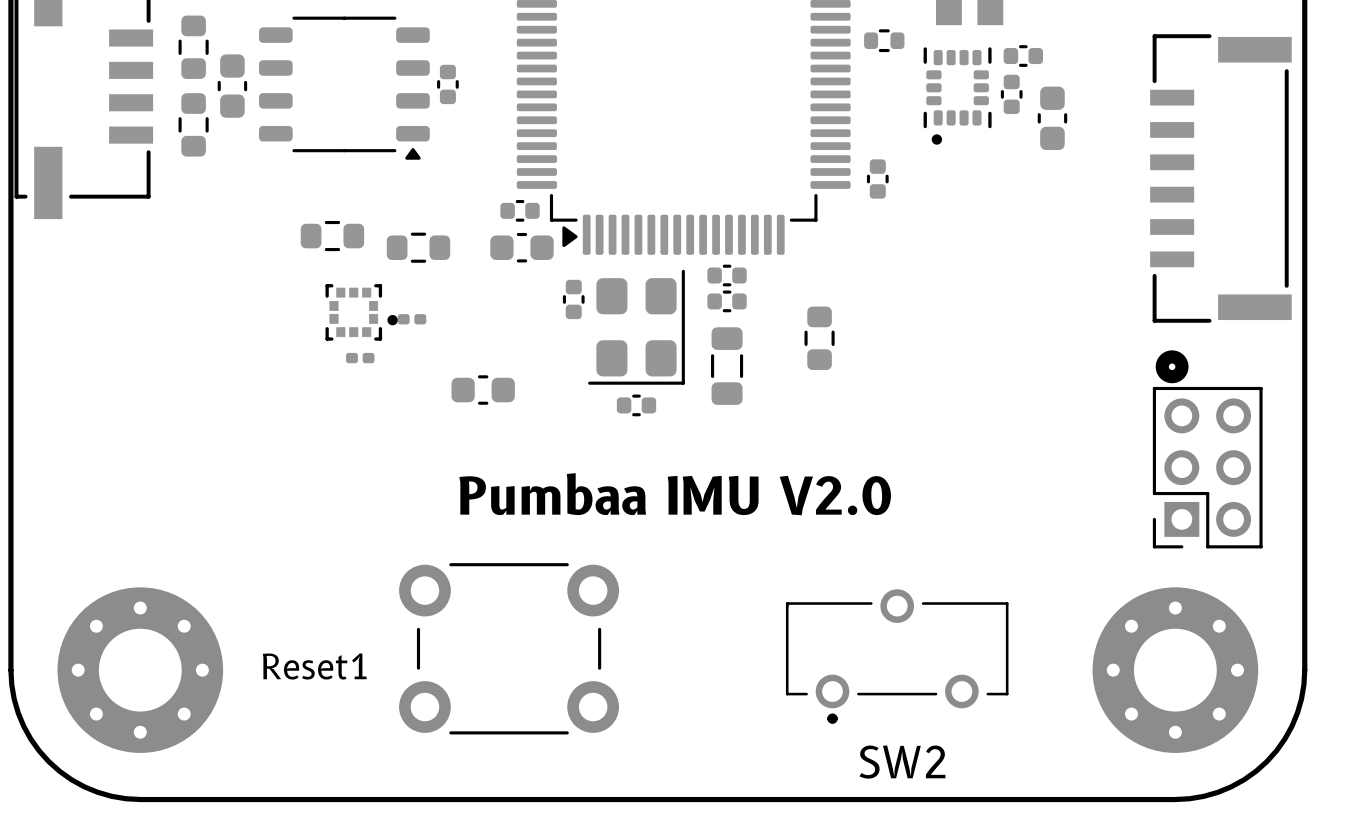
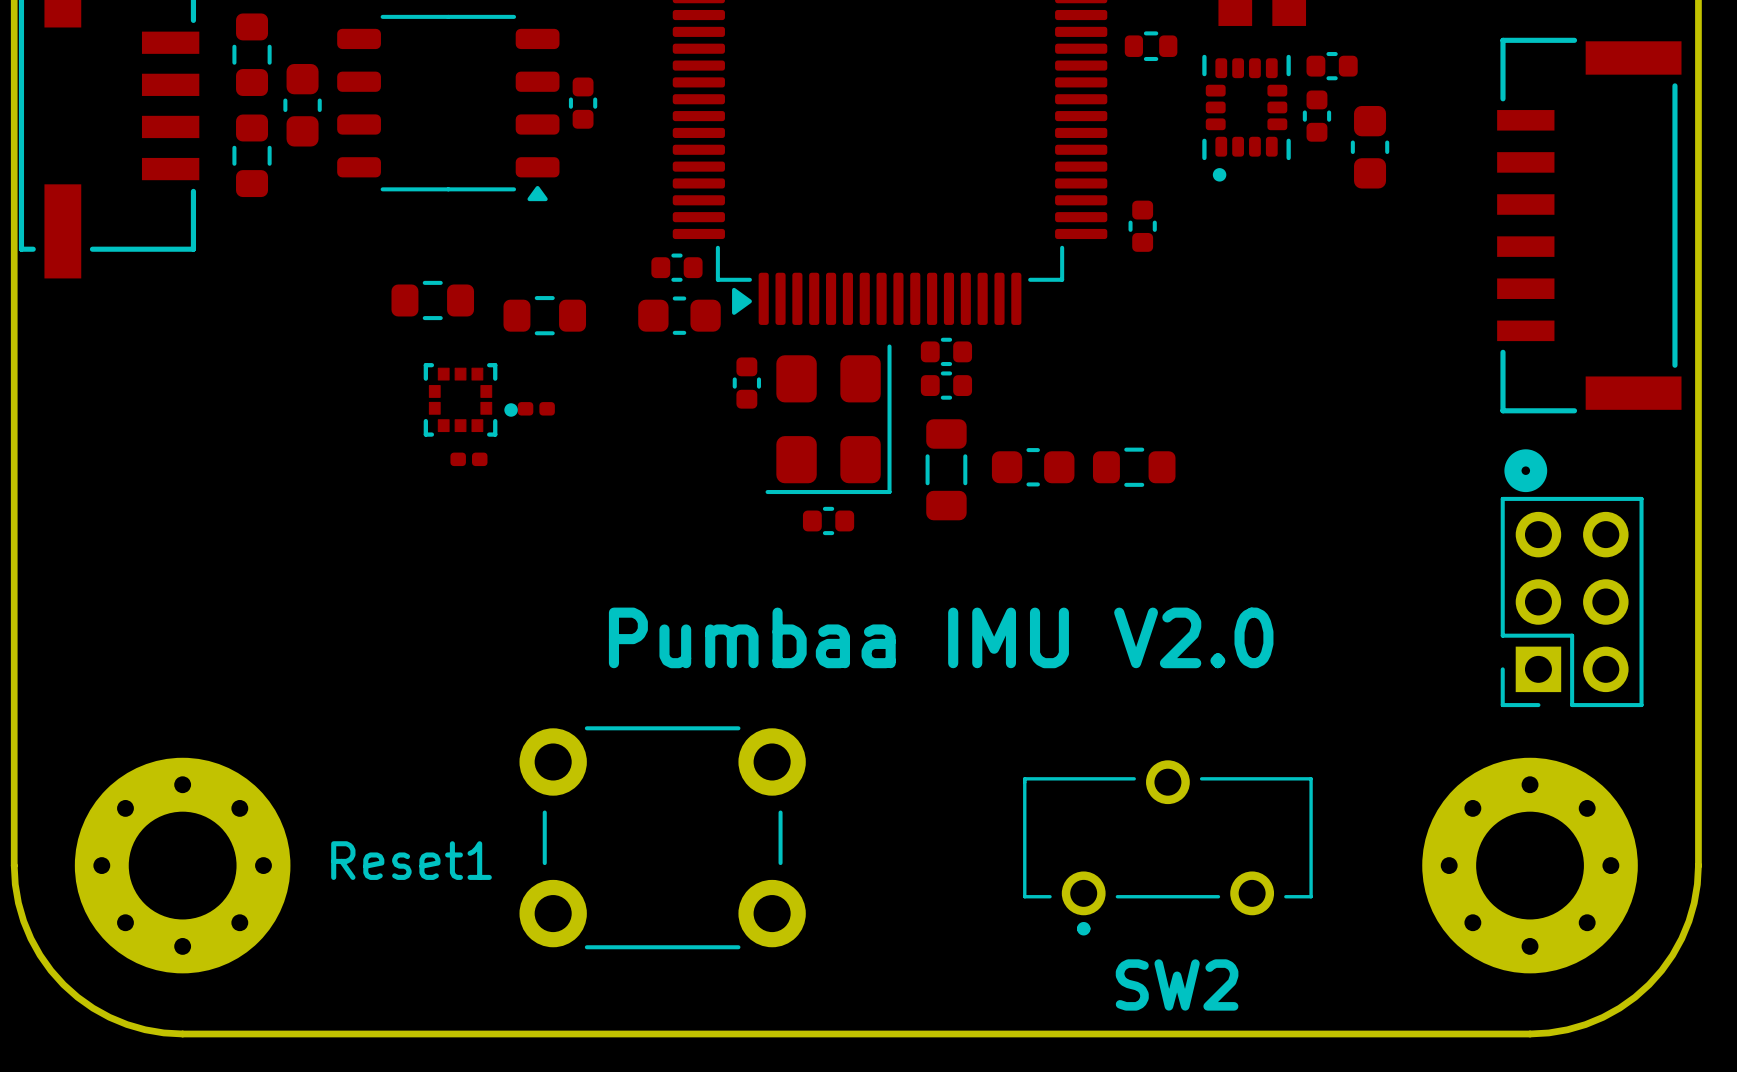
part rotation: 0° (819, 338) -> 90° clockwise (1134, 467)
part position: (819, 338) -> (1134, 467)
part position: (483, 390) -> (1033, 467)

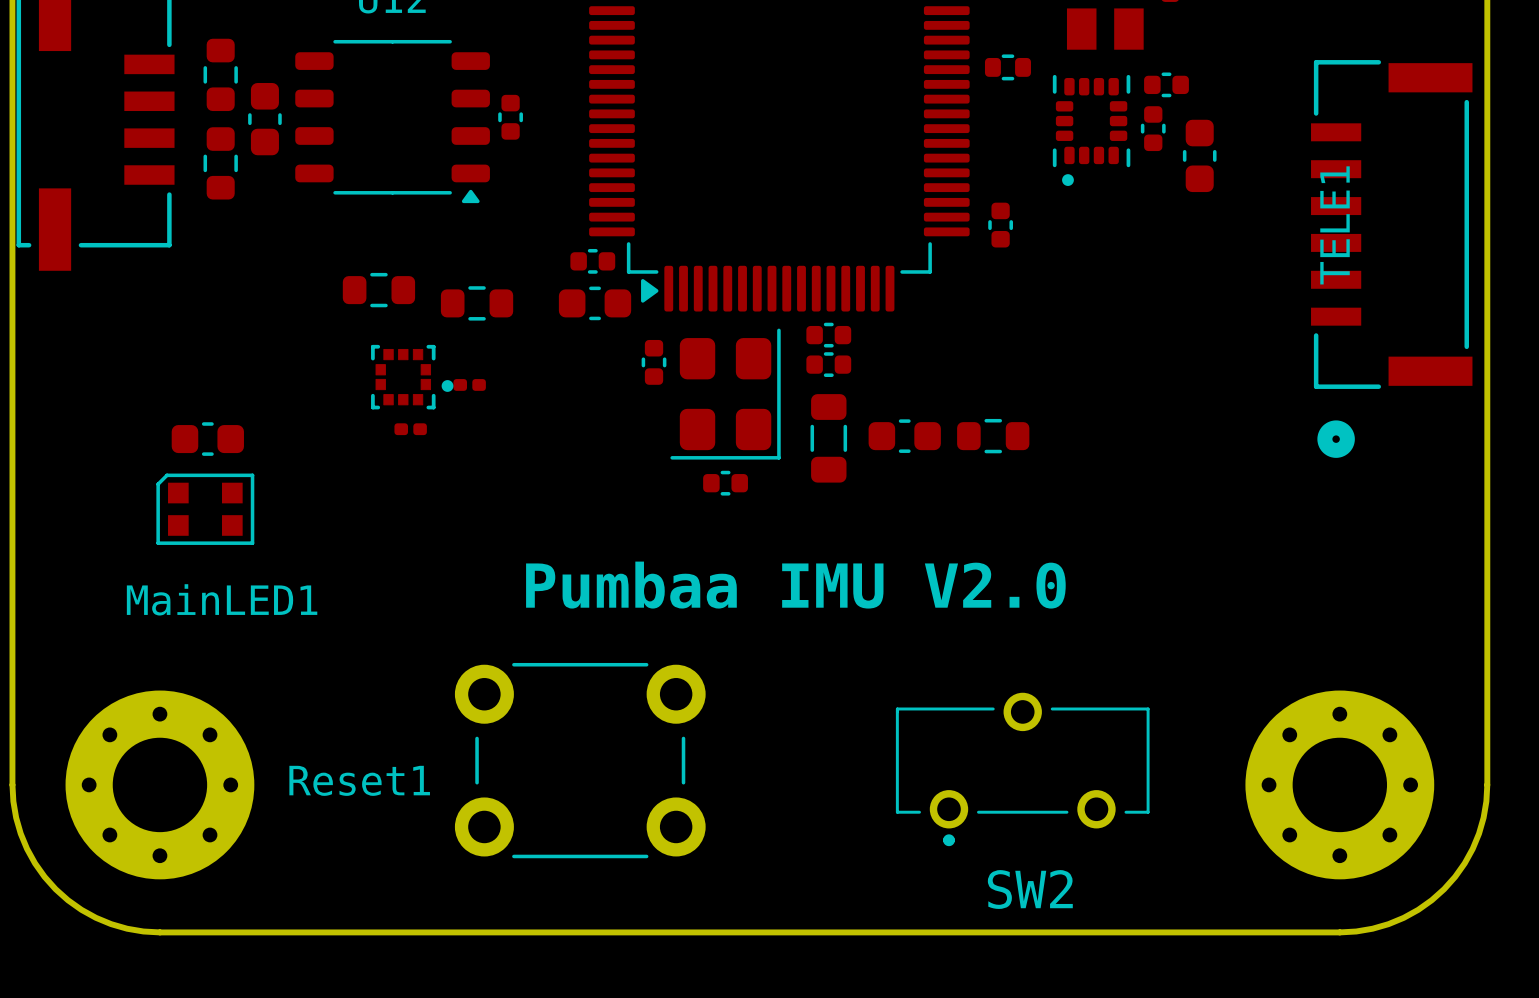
TELE1 name: none -> TELE1 (1335, 225)
part: none -> (207, 439)
MainLED1: none -> (205, 509)
part: (1572, 601) -> none

